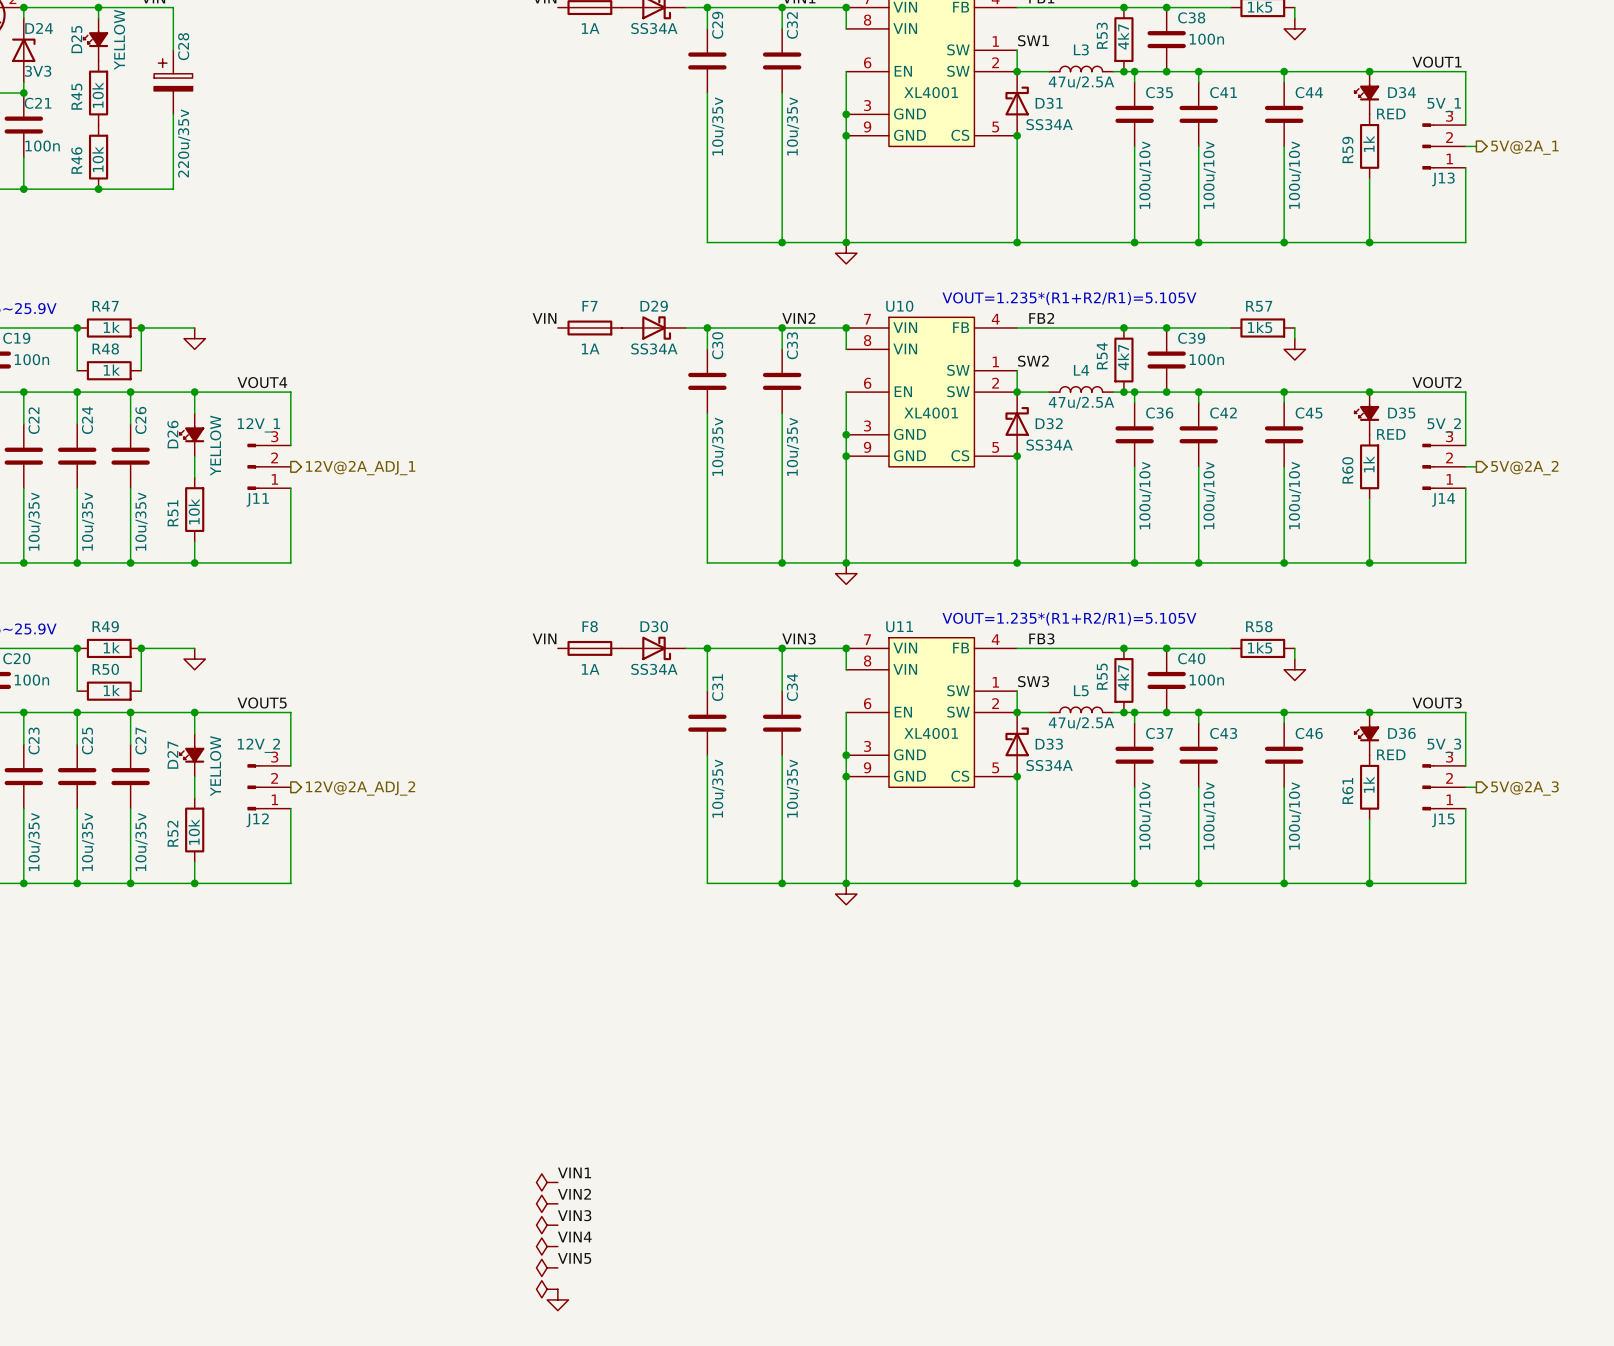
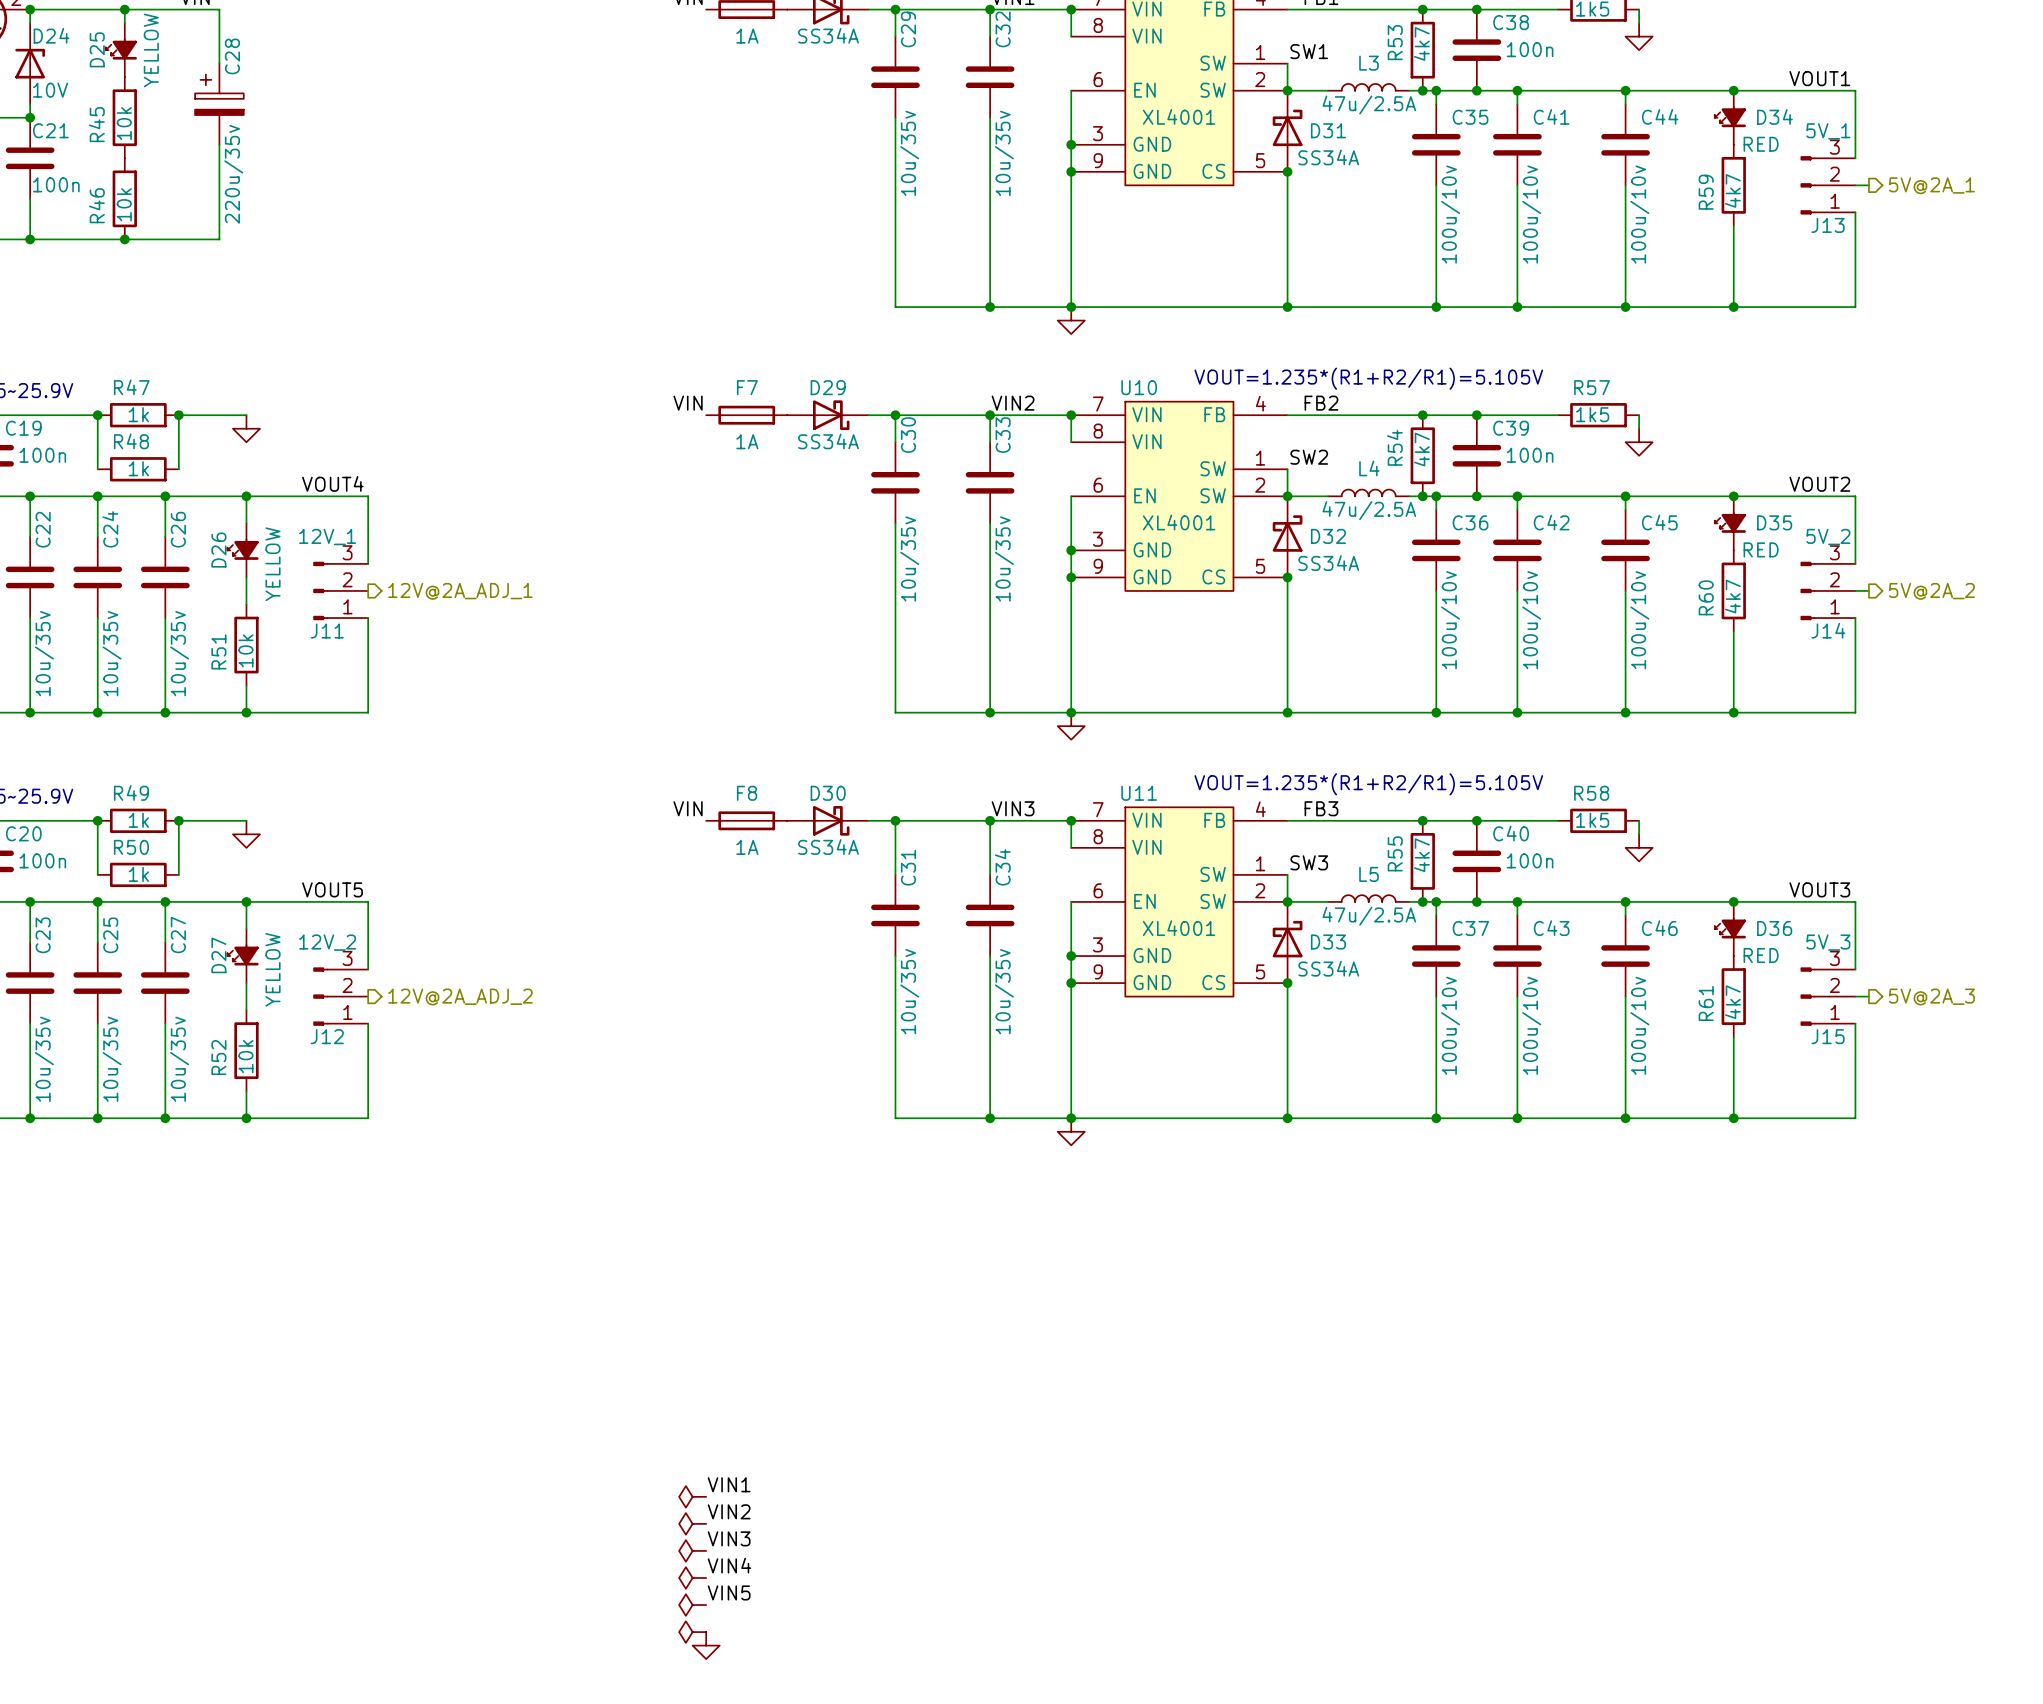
D24 value: 3V3 (38, 71) -> 10V (50, 90)
R59 value: 1k (1368, 143) -> 4k7 (1732, 190)
R60 value: 1k (1368, 464) -> 4k7 (1732, 596)
R61 value: 1k (1368, 784) -> 4k7 (1732, 1002)

